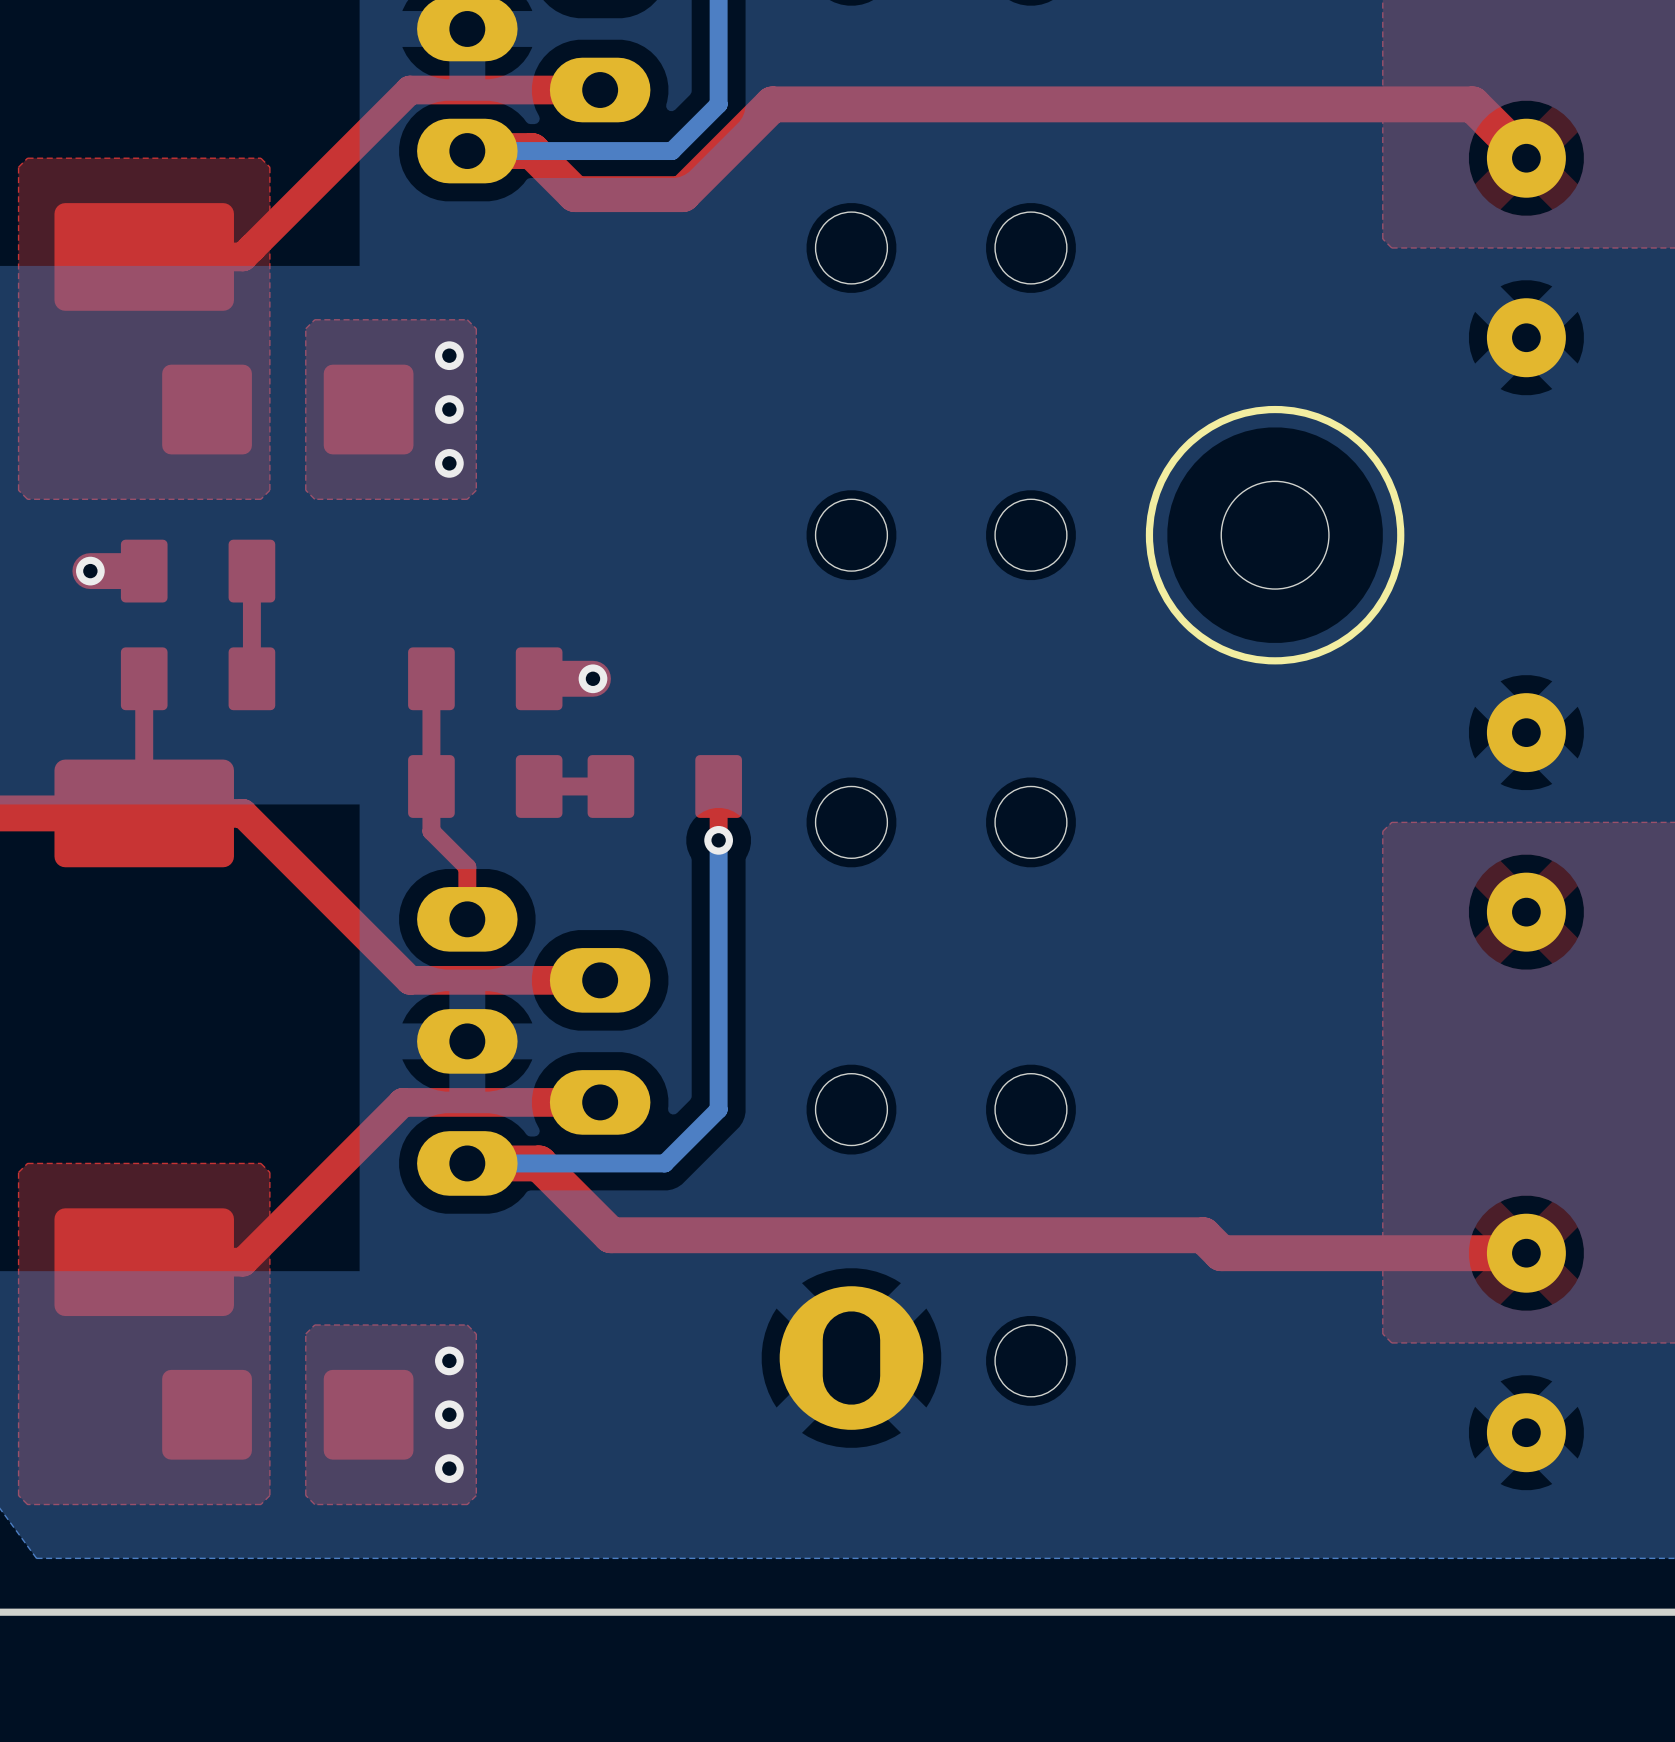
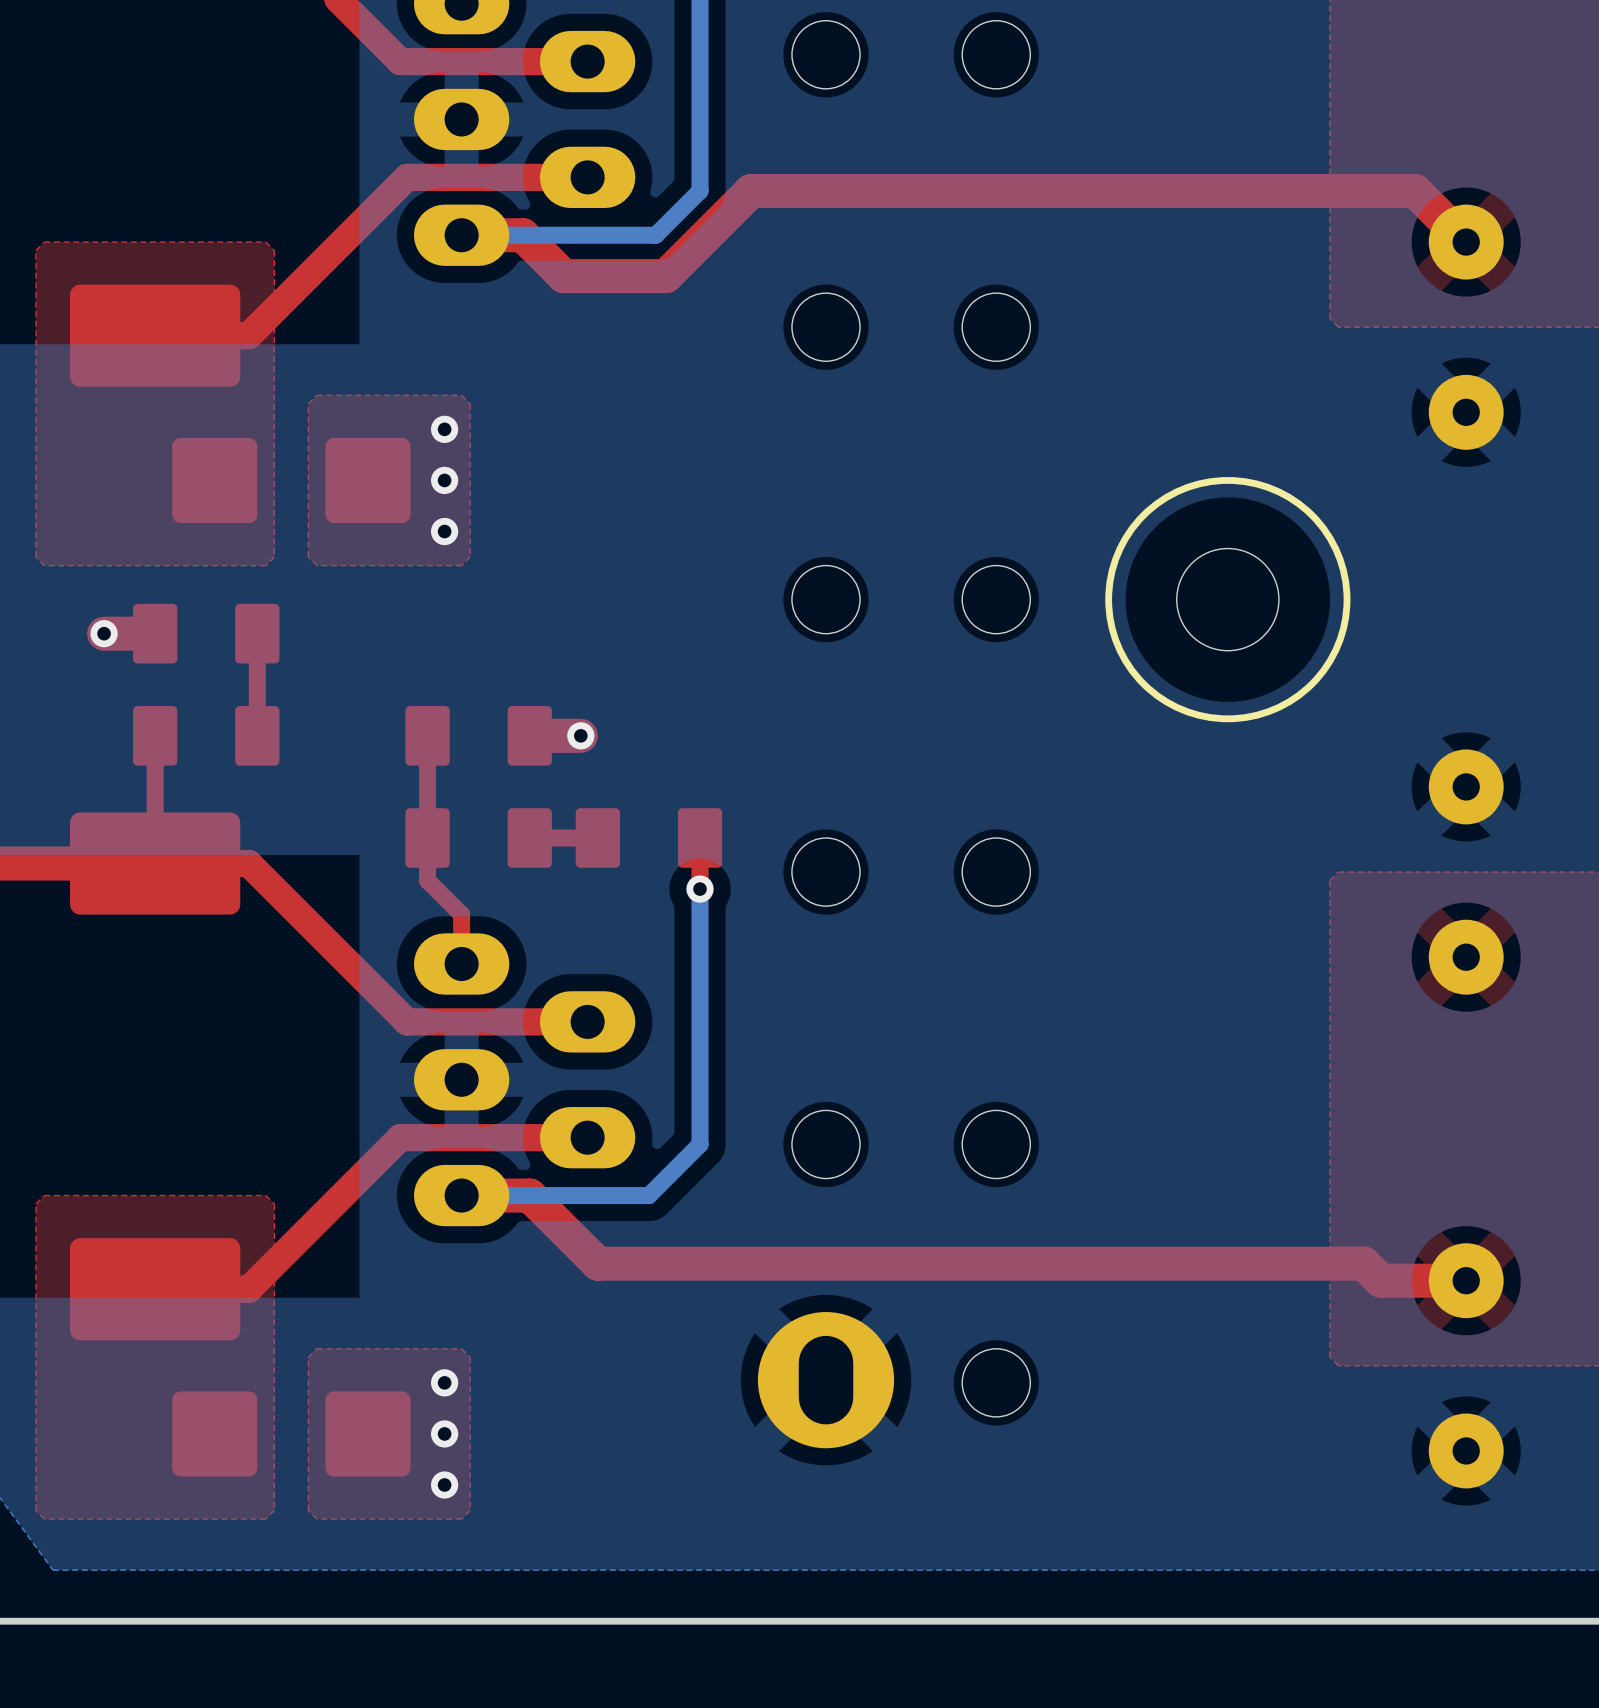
top track: (1203, 1235) (1221, 1253) (1436, 1253) -> (1159, 1263) (1364, 1263) (1381, 1280)

